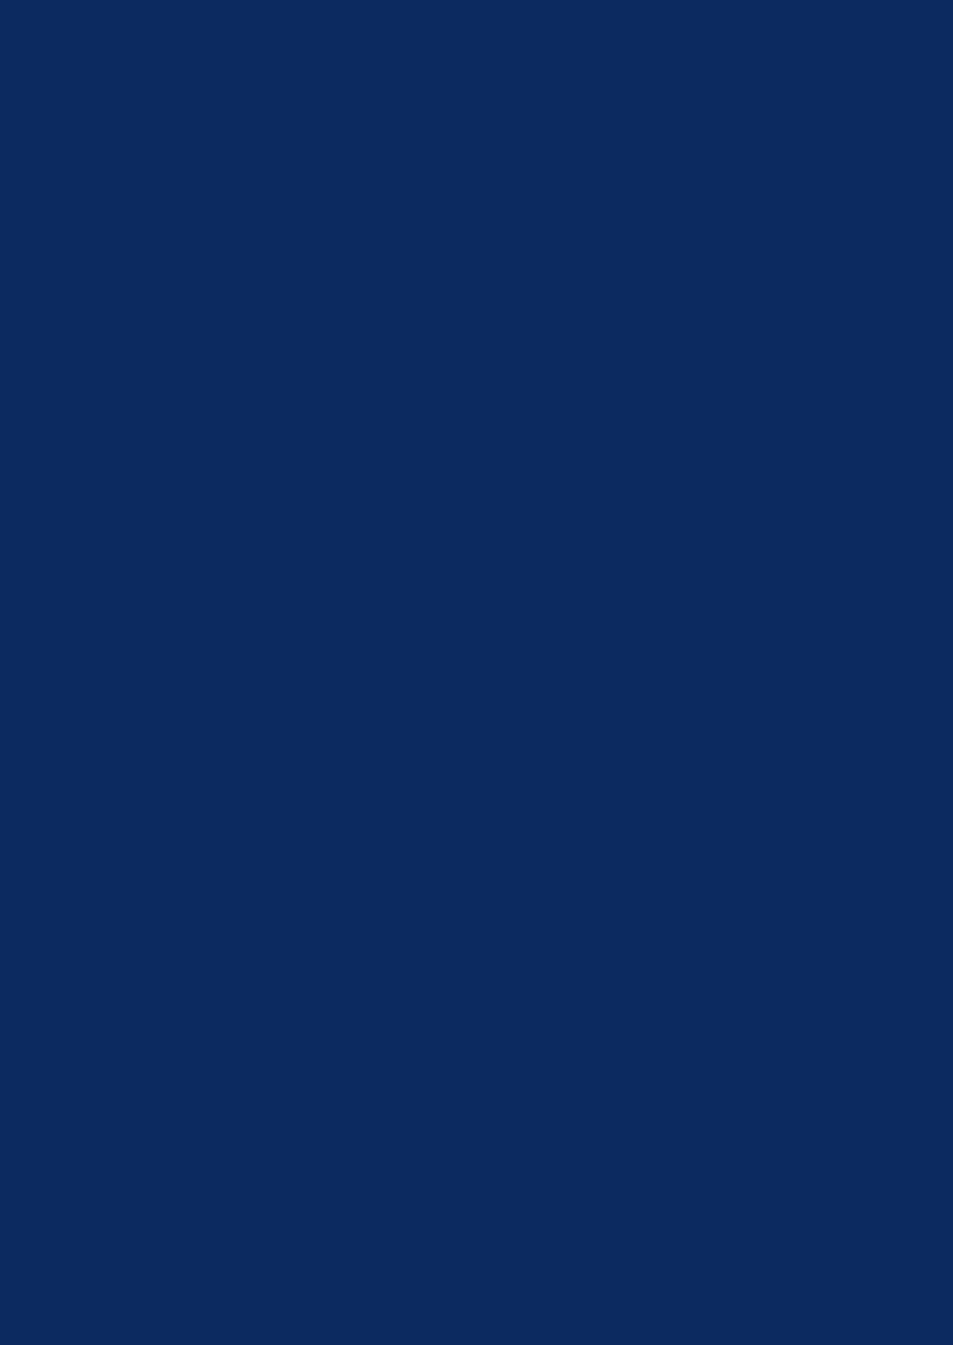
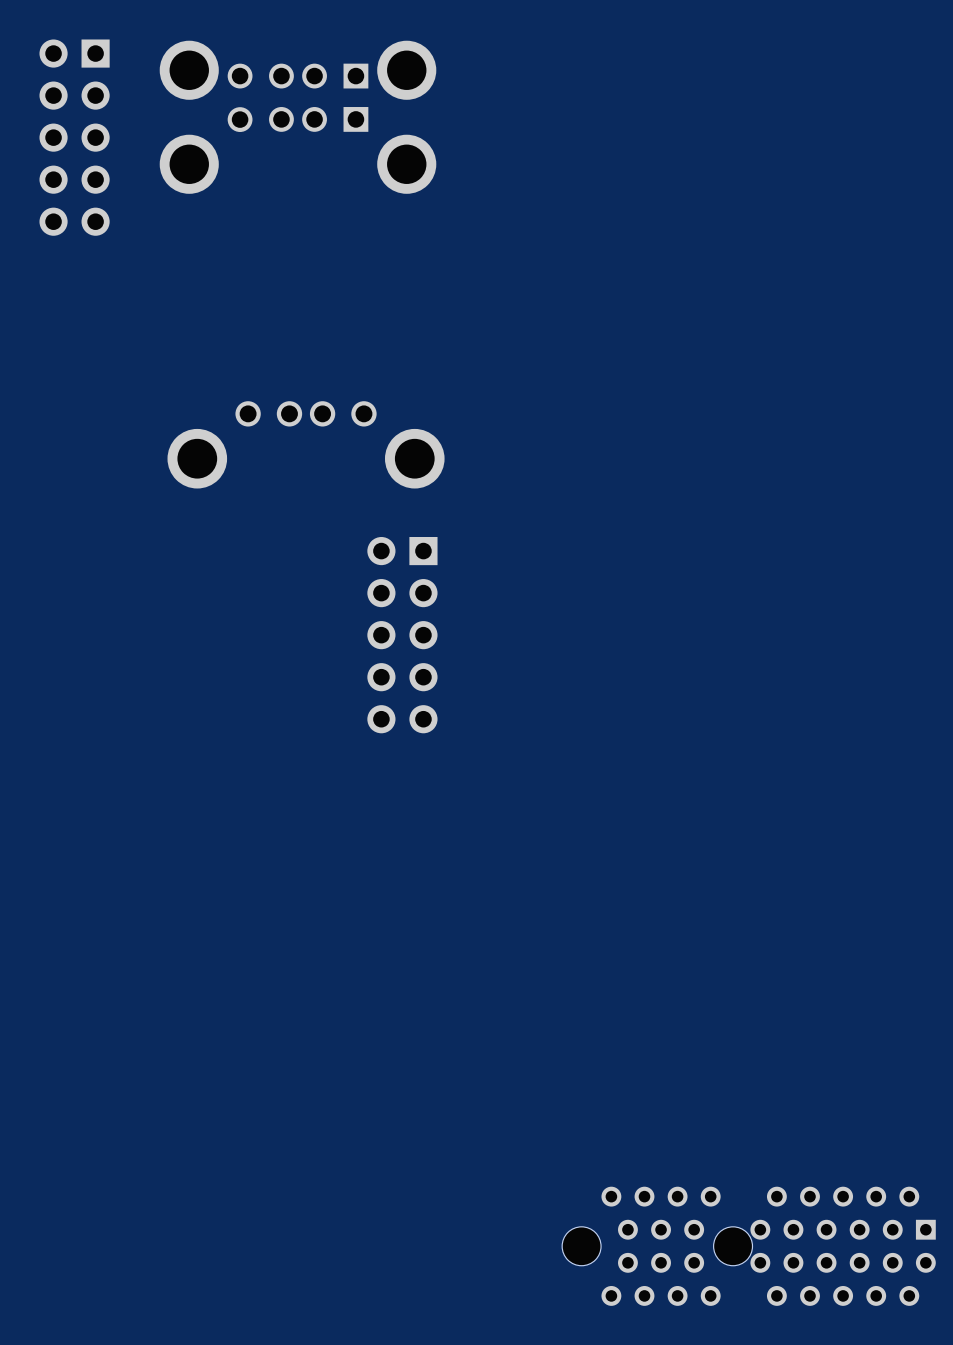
part: none -> (298, 117)
part: none -> (74, 137)
part: none -> (306, 444)
part: none -> (402, 635)
part: none -> (748, 1246)

